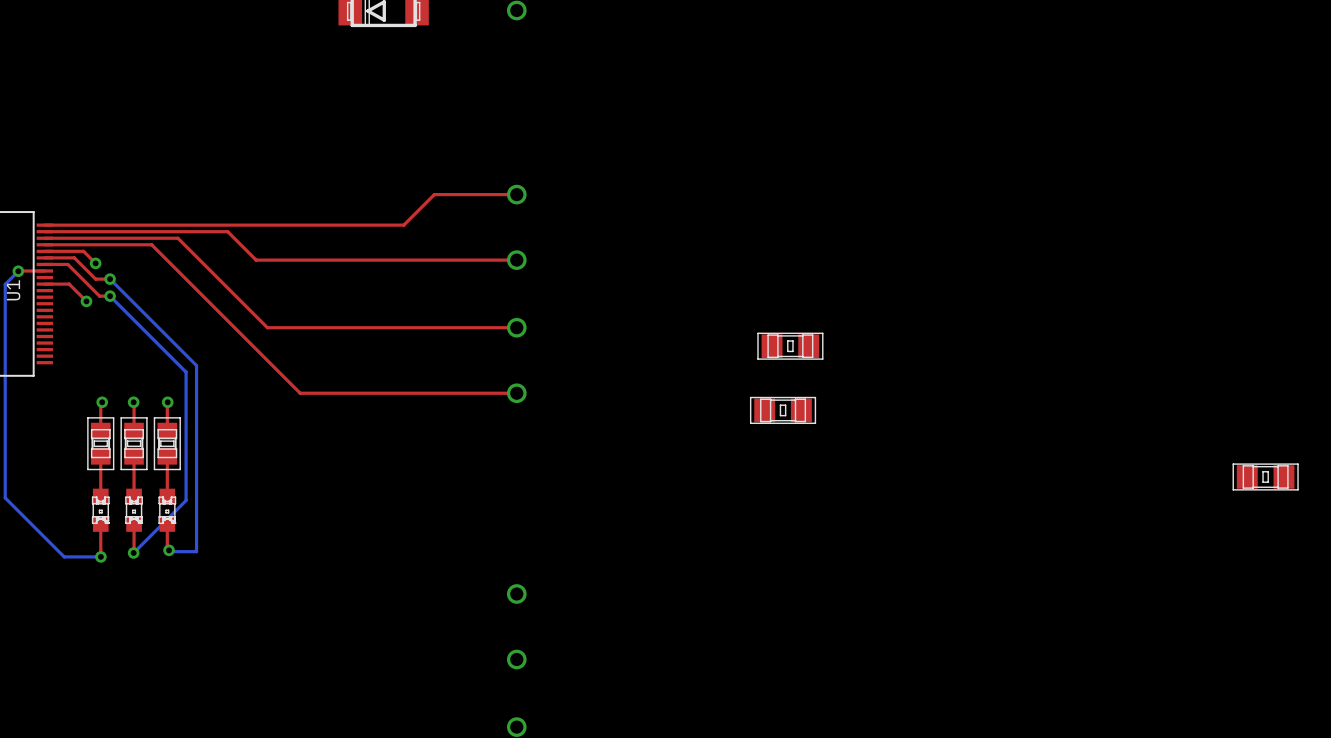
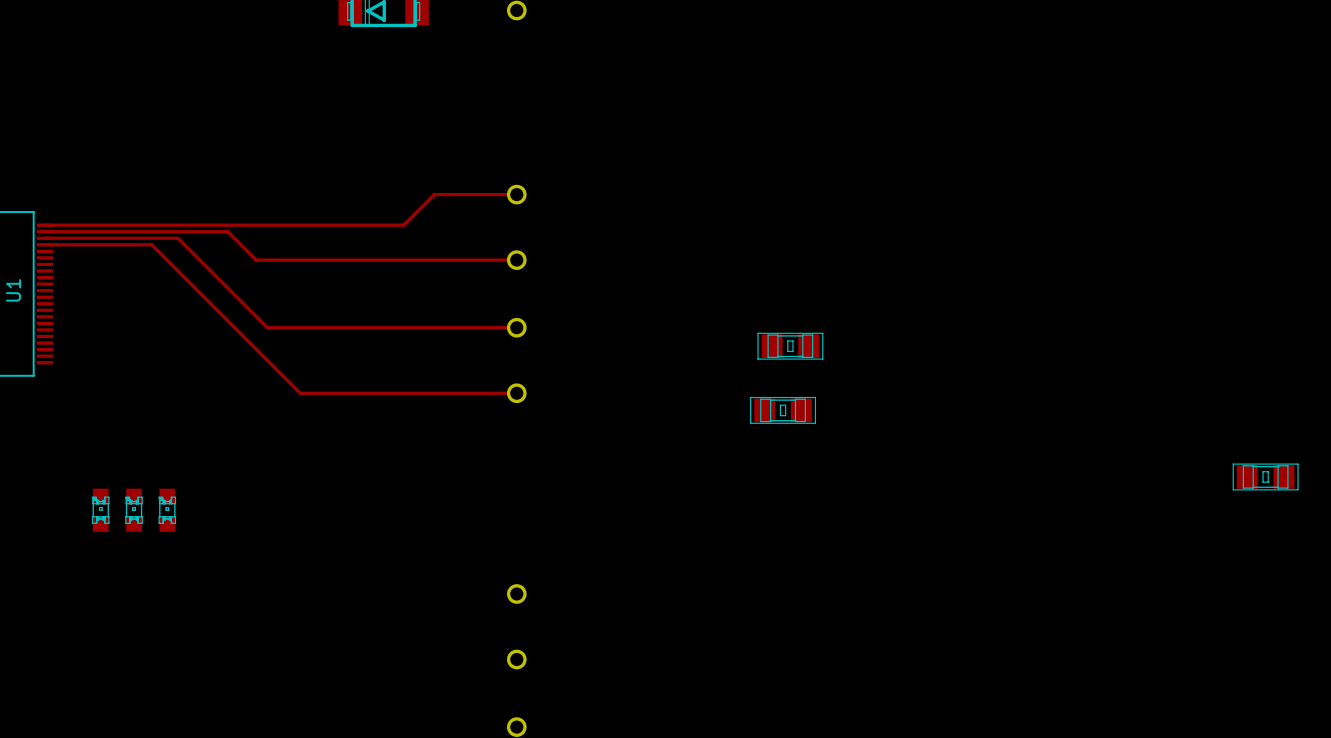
top track: (44, 251) (83, 251) (95, 263) -> none
top track: (44, 257) (74, 257) (95, 279) (110, 279) -> none
via: (95, 263) -> none
top track: (44, 264) (67, 264) (99, 296) (110, 296) -> none
top track: (44, 270) (18, 271) -> none
bottom track: (18, 271) (5, 284) (5, 497) (64, 556) (100, 556) -> none
via: (18, 271) -> none
bottom track: (110, 279) (196, 365) (196, 551) (169, 550) -> none
via: (110, 279) -> none
top track: (44, 284) (69, 284) (86, 301) -> none
bottom track: (110, 296) (186, 372) (186, 500) (133, 552) -> none
via: (110, 296) -> none
via: (86, 301) -> none
top track: (102, 402) (100, 431) -> none
via: (102, 402) -> none
top track: (133, 402) (134, 431) -> none
via: (133, 402) -> none
top track: (167, 402) (167, 431) -> none
via: (167, 402) -> none
part: (100, 443) -> none
part: (134, 443) -> none
part: (167, 443) -> none
top track: (100, 456) (100, 496) -> none
top track: (134, 456) (134, 496) -> none
top track: (167, 456) (167, 496) -> none
part rotation: 0° (100, 510) -> 180° (100, 510)
part rotation: 0° (134, 510) -> 180° (134, 510)
part rotation: 0° (167, 510) -> 180° (167, 510)
top track: (100, 524) (100, 556) -> none
top track: (134, 524) (133, 552) -> none
top track: (167, 524) (167, 548) (169, 550) -> none
via: (169, 550) -> none
via: (133, 552) -> none
via: (100, 556) -> none

